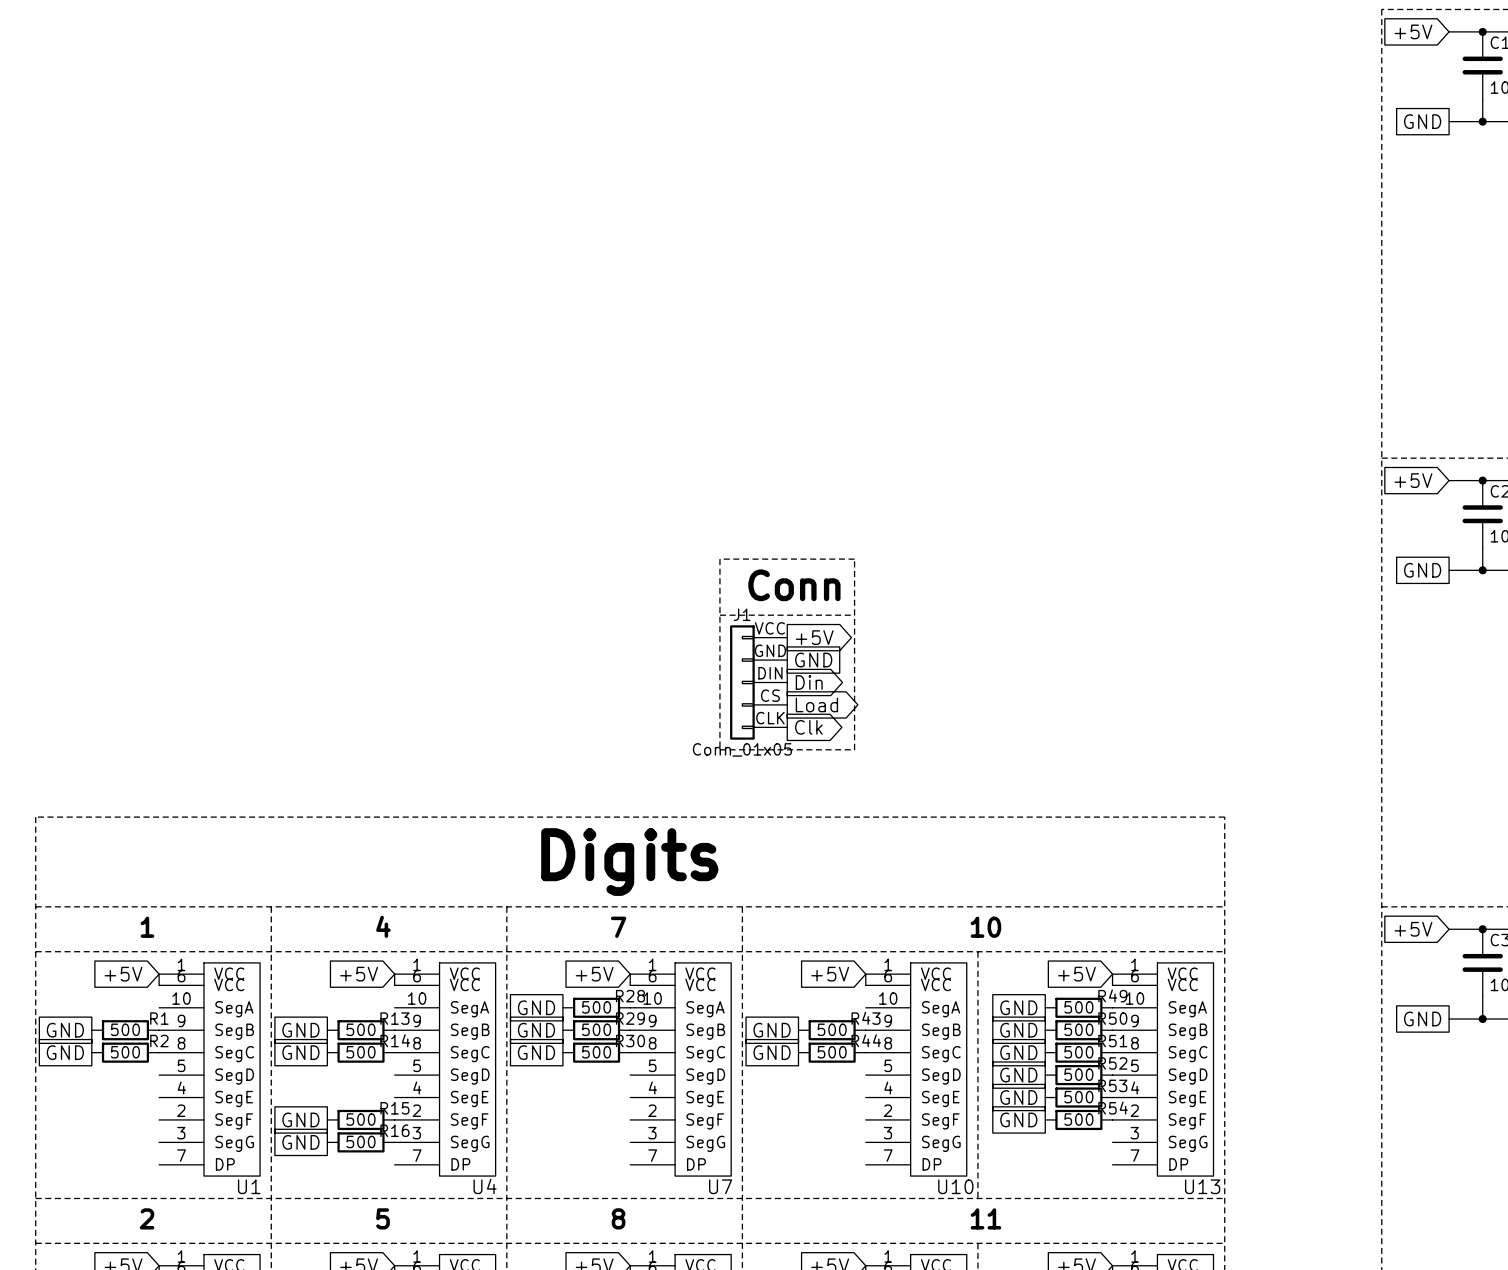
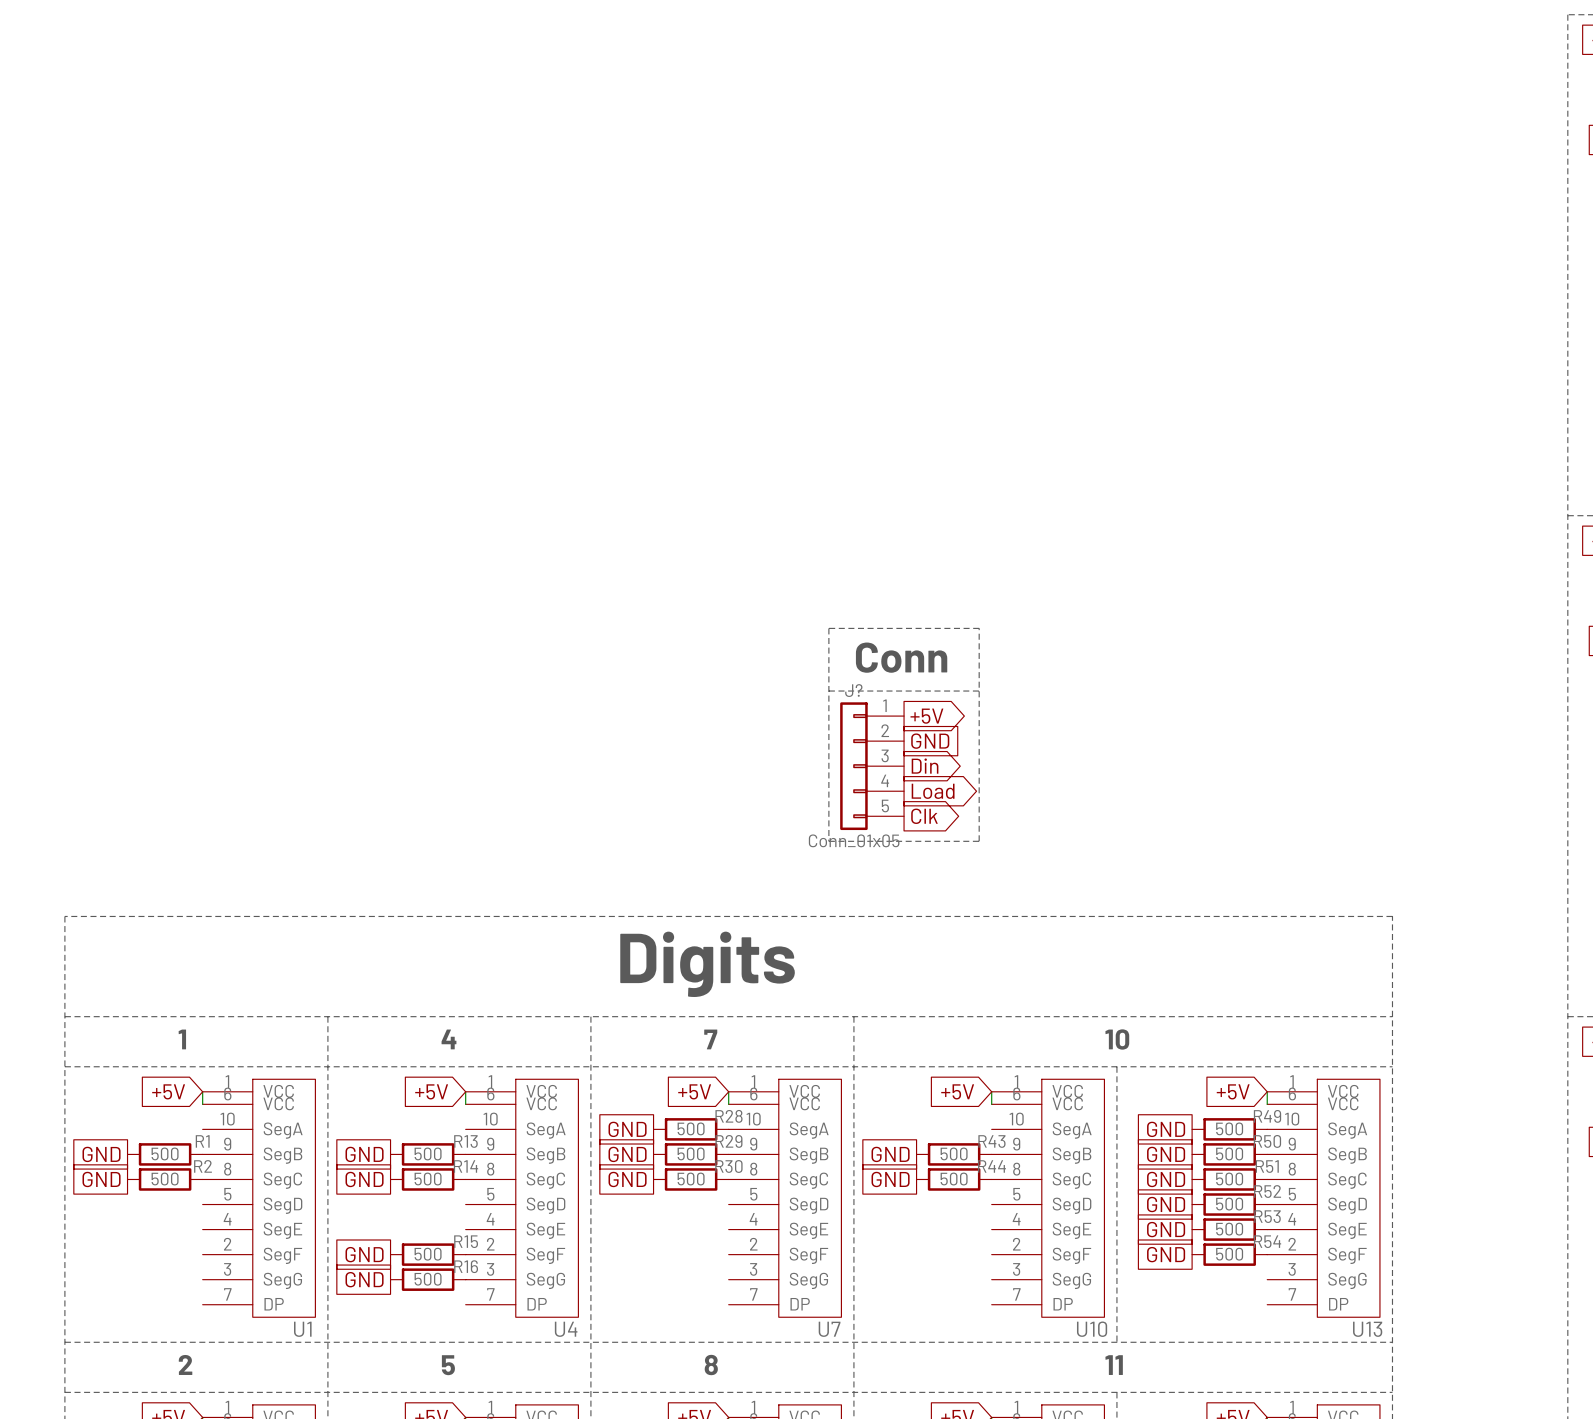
J1 name: J1 (742, 614) -> J? (853, 690)
J1 pin number: VCC (769, 628) -> 1 (884, 705)
J1 pin number: GND (770, 650) -> 2 (885, 730)
J1 pin number: DIN (770, 673) -> 3 (885, 755)
J1 pin number: CS (770, 695) -> 4 (885, 780)
J1 pin number: CLK (770, 718) -> 5 (885, 806)

